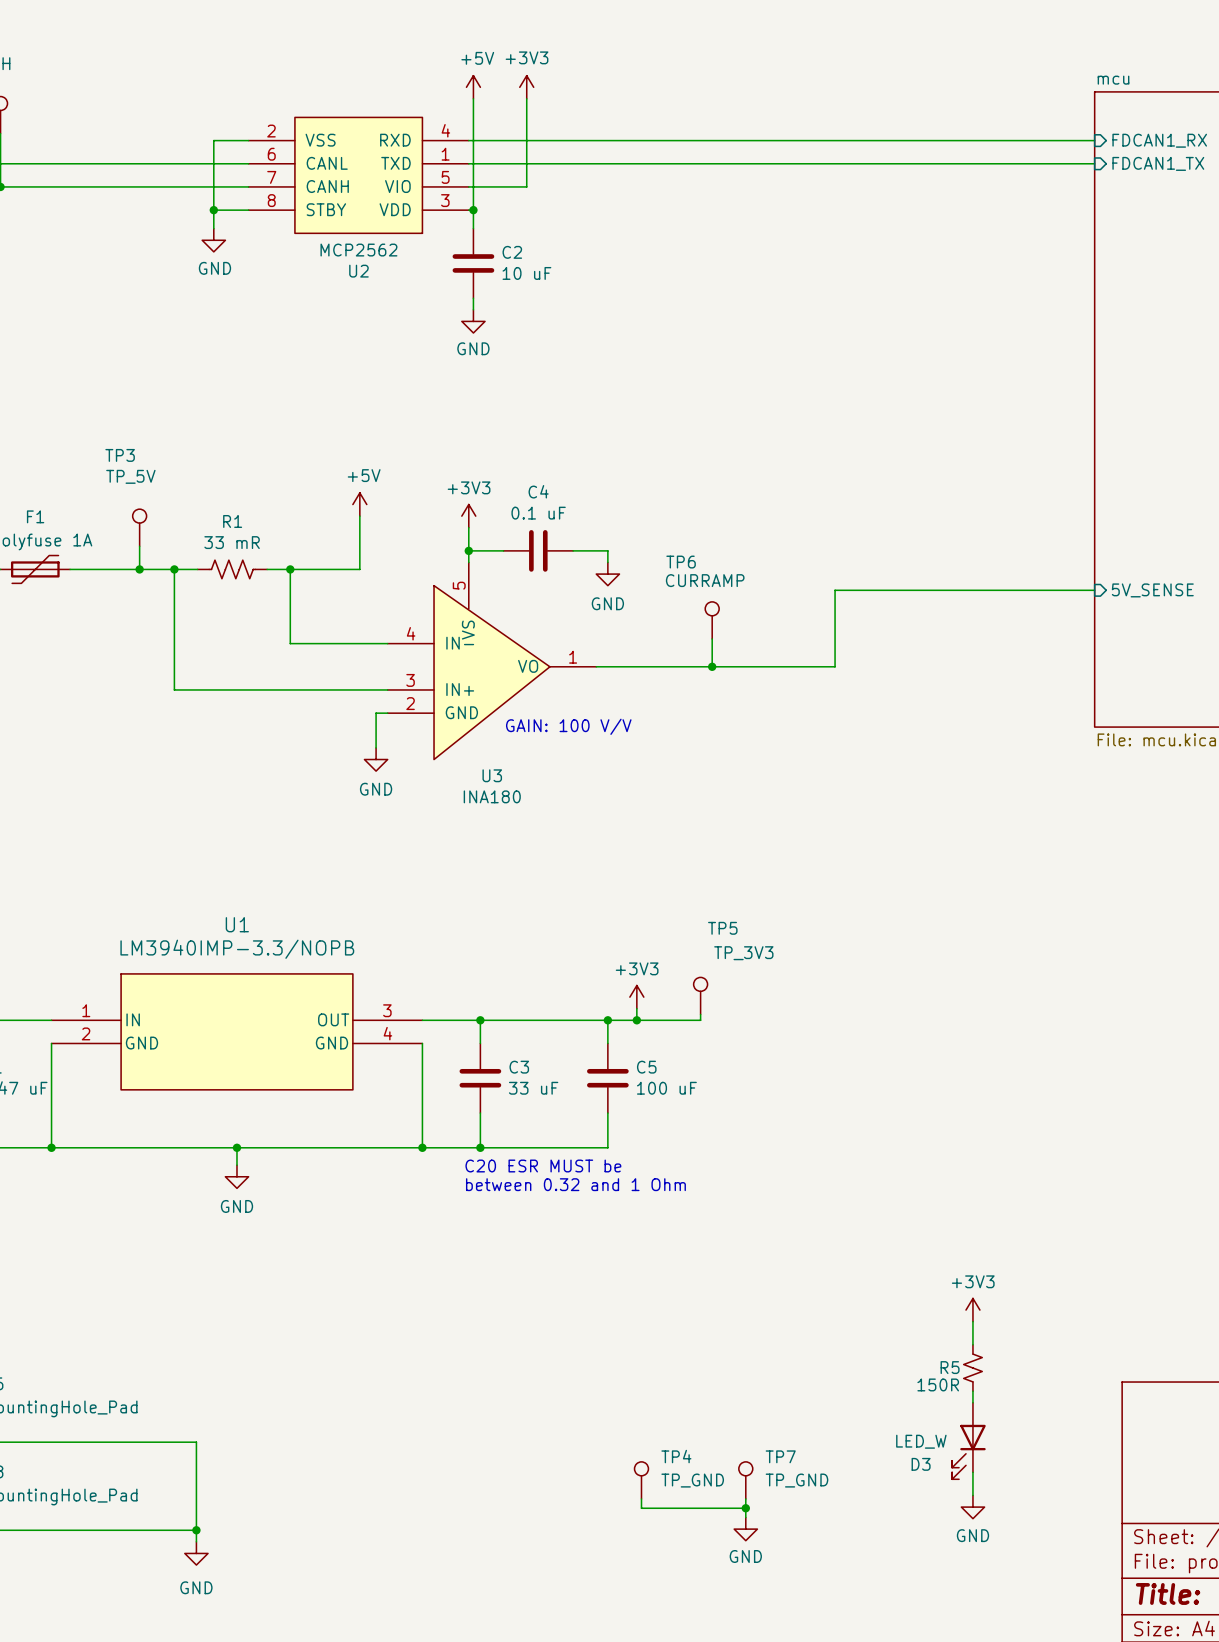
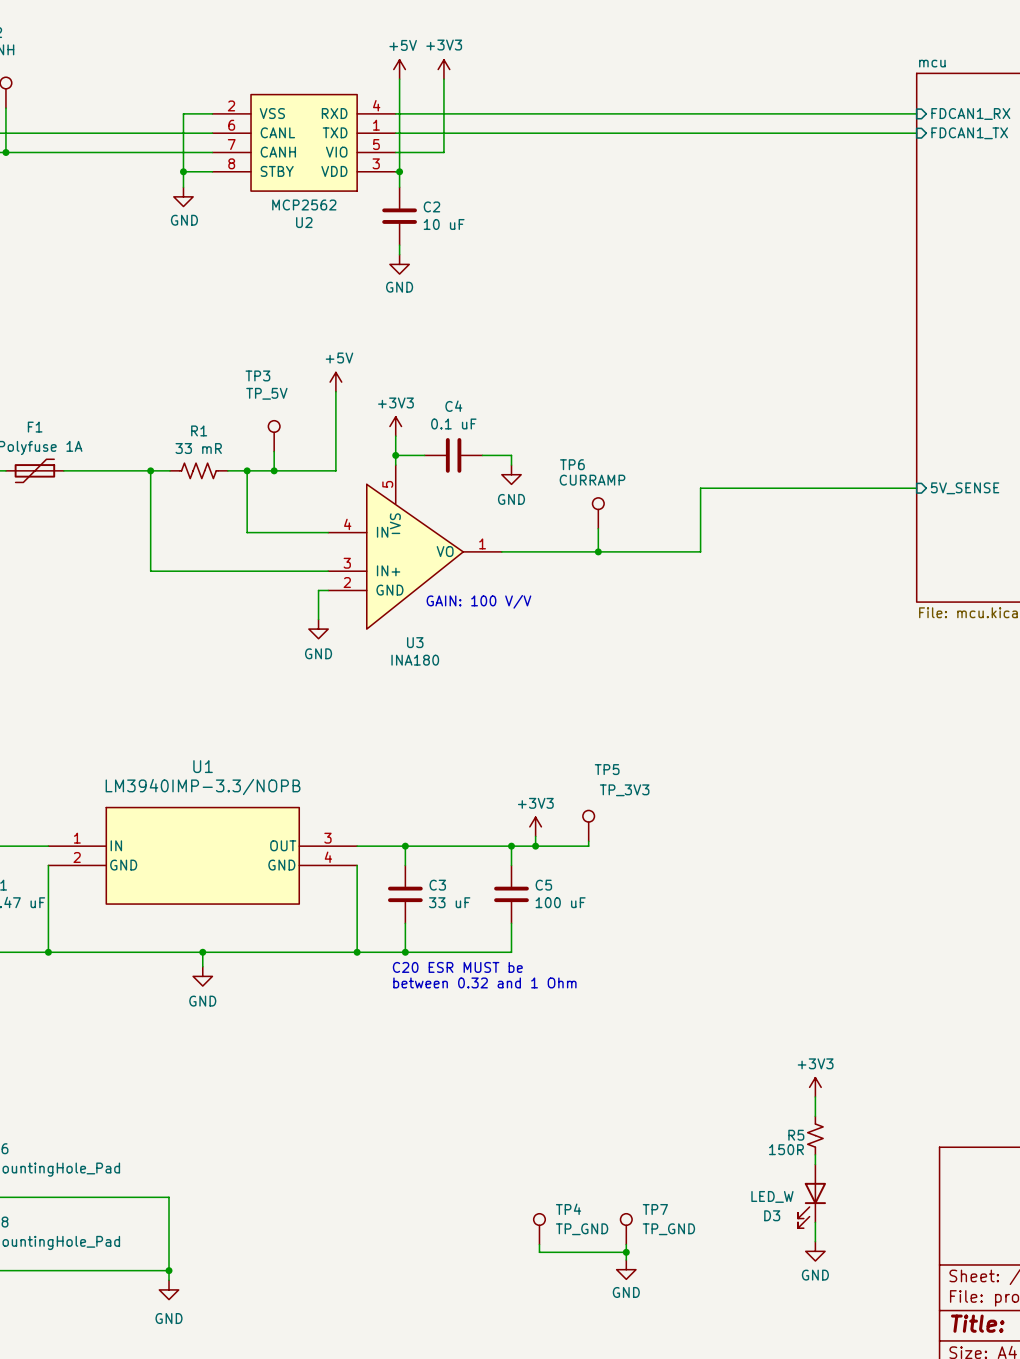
power symbol position: +5V (359, 504) -> +5V (335, 382)
wire: (359, 516) (359, 569) -> (335, 391) (335, 470) (305, 470)
TP3 position: (139, 527) -> (274, 436)
wire: (139, 546) (139, 569) -> (274, 451) (274, 470)
junction: (139, 569) -> none
junction: none -> (274, 470)

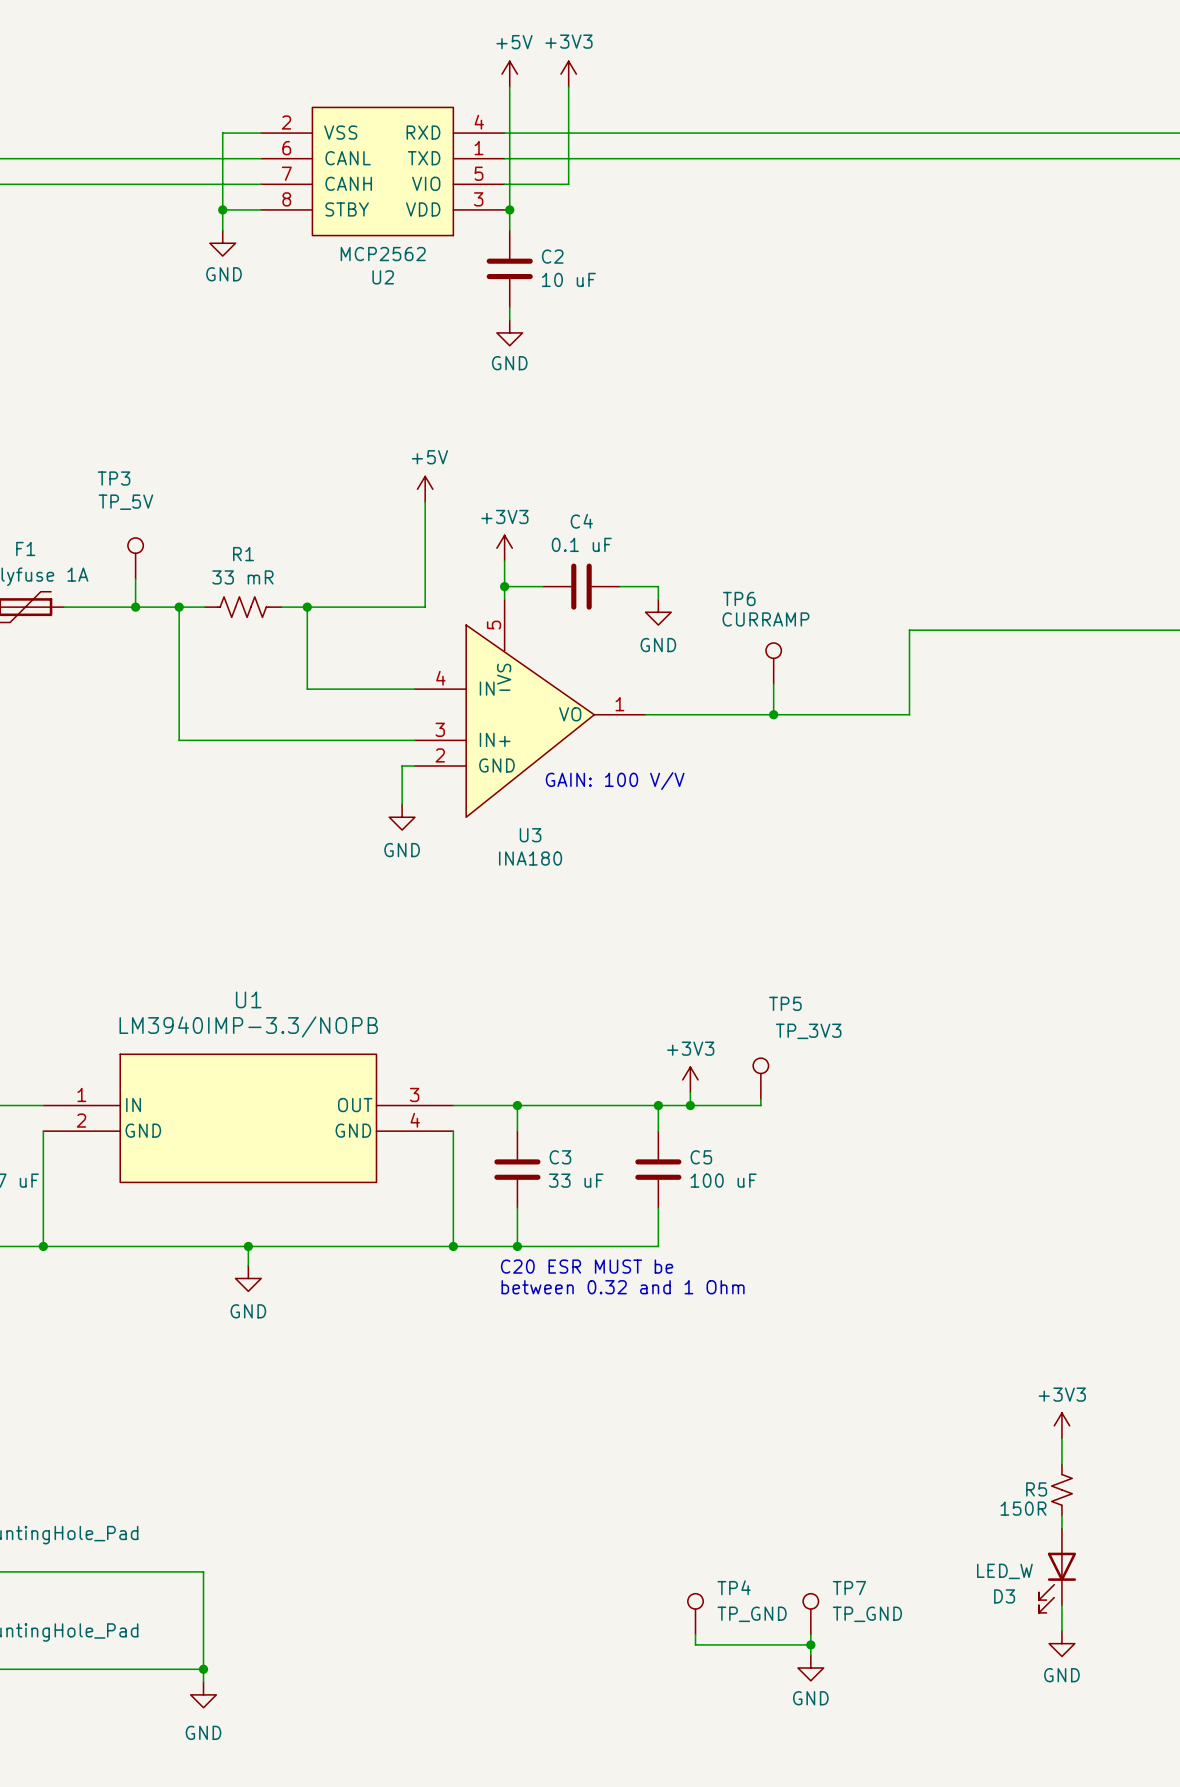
TP3 position: (274, 436) -> (135, 558)
wire: none -> (135, 578) (135, 607)
wire: (274, 451) (274, 470) -> none
junction: none -> (135, 607)
junction: (274, 470) -> none

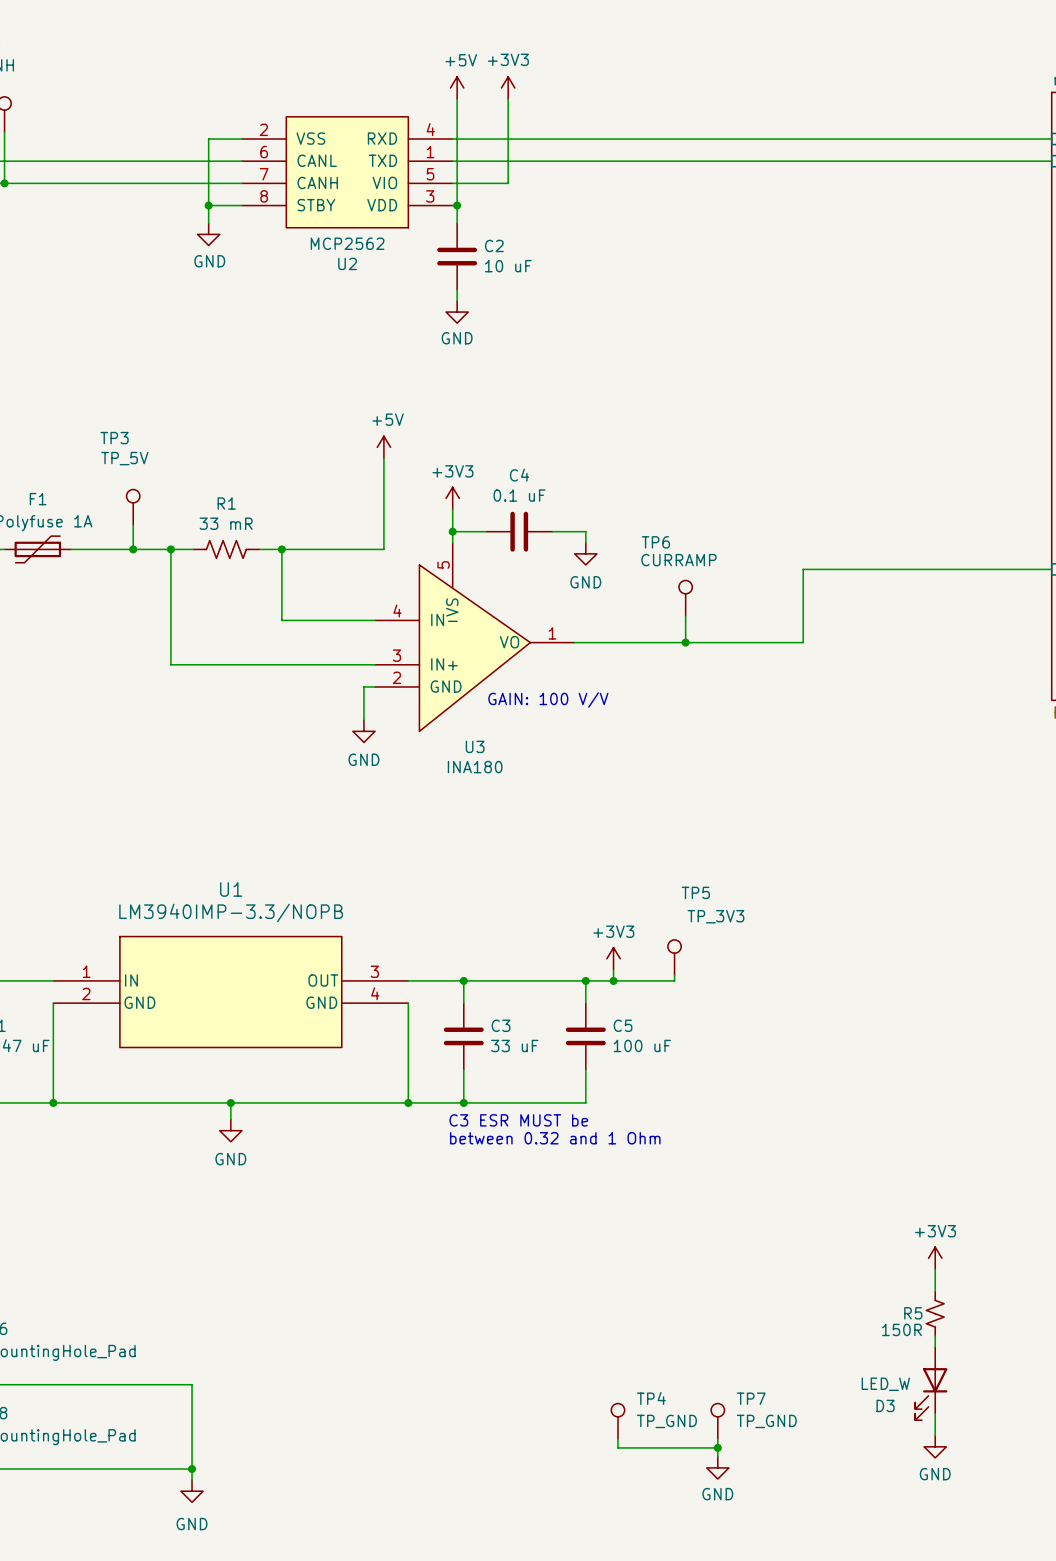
text: C20 ESR MUST be (587, 1266) -> C3 ESR MUST be (518, 1120)

